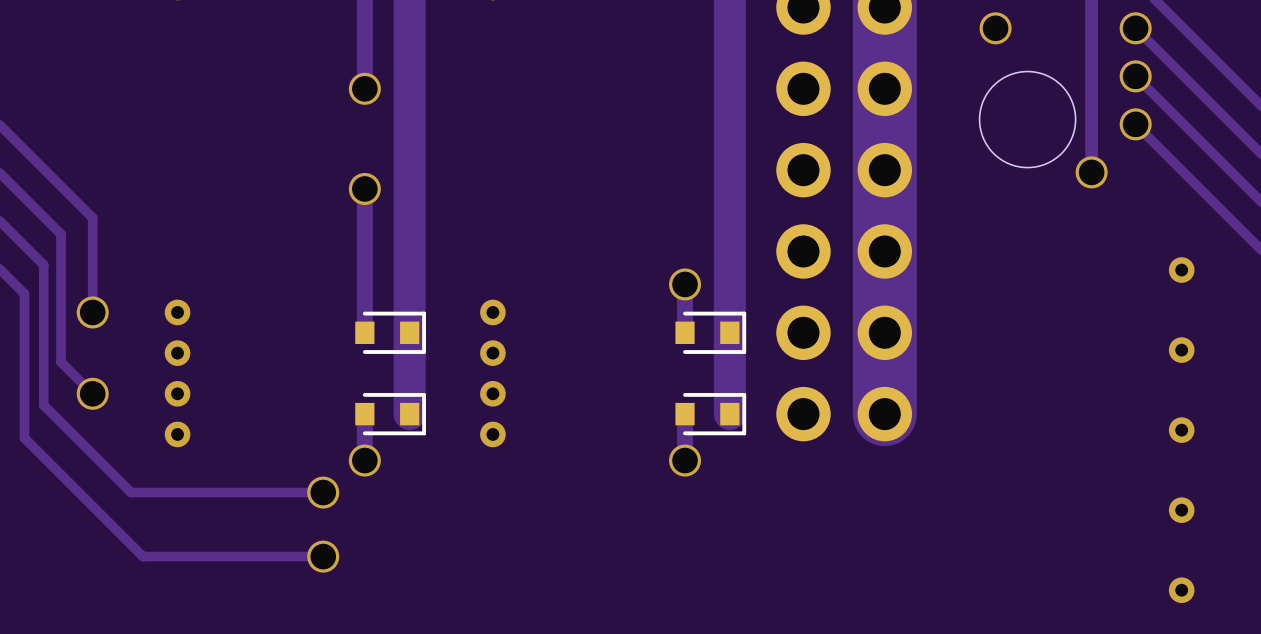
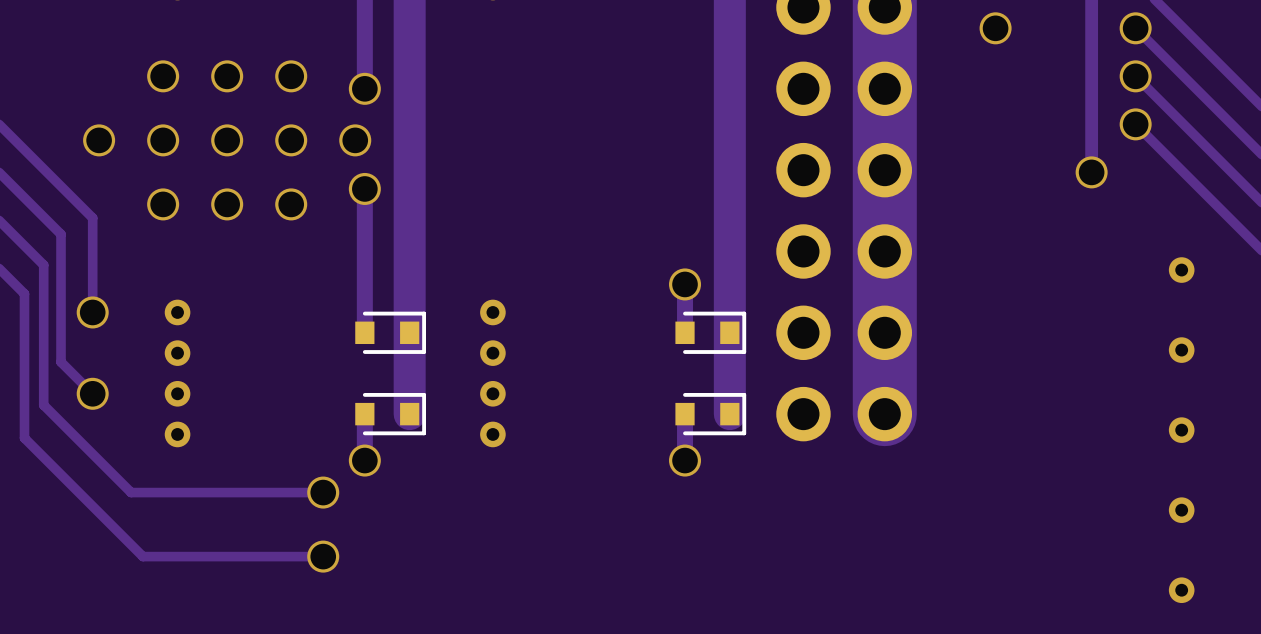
round board edge: [978, 70, 1077, 169] -> none
via: none -> (163, 76)
via: none -> (227, 76)
via: none -> (291, 76)
via: none -> (99, 140)
via: none -> (163, 140)
via: none -> (227, 140)
via: none -> (291, 140)
via: none -> (355, 140)
via: none -> (163, 204)
via: none -> (227, 204)
via: none -> (291, 204)

